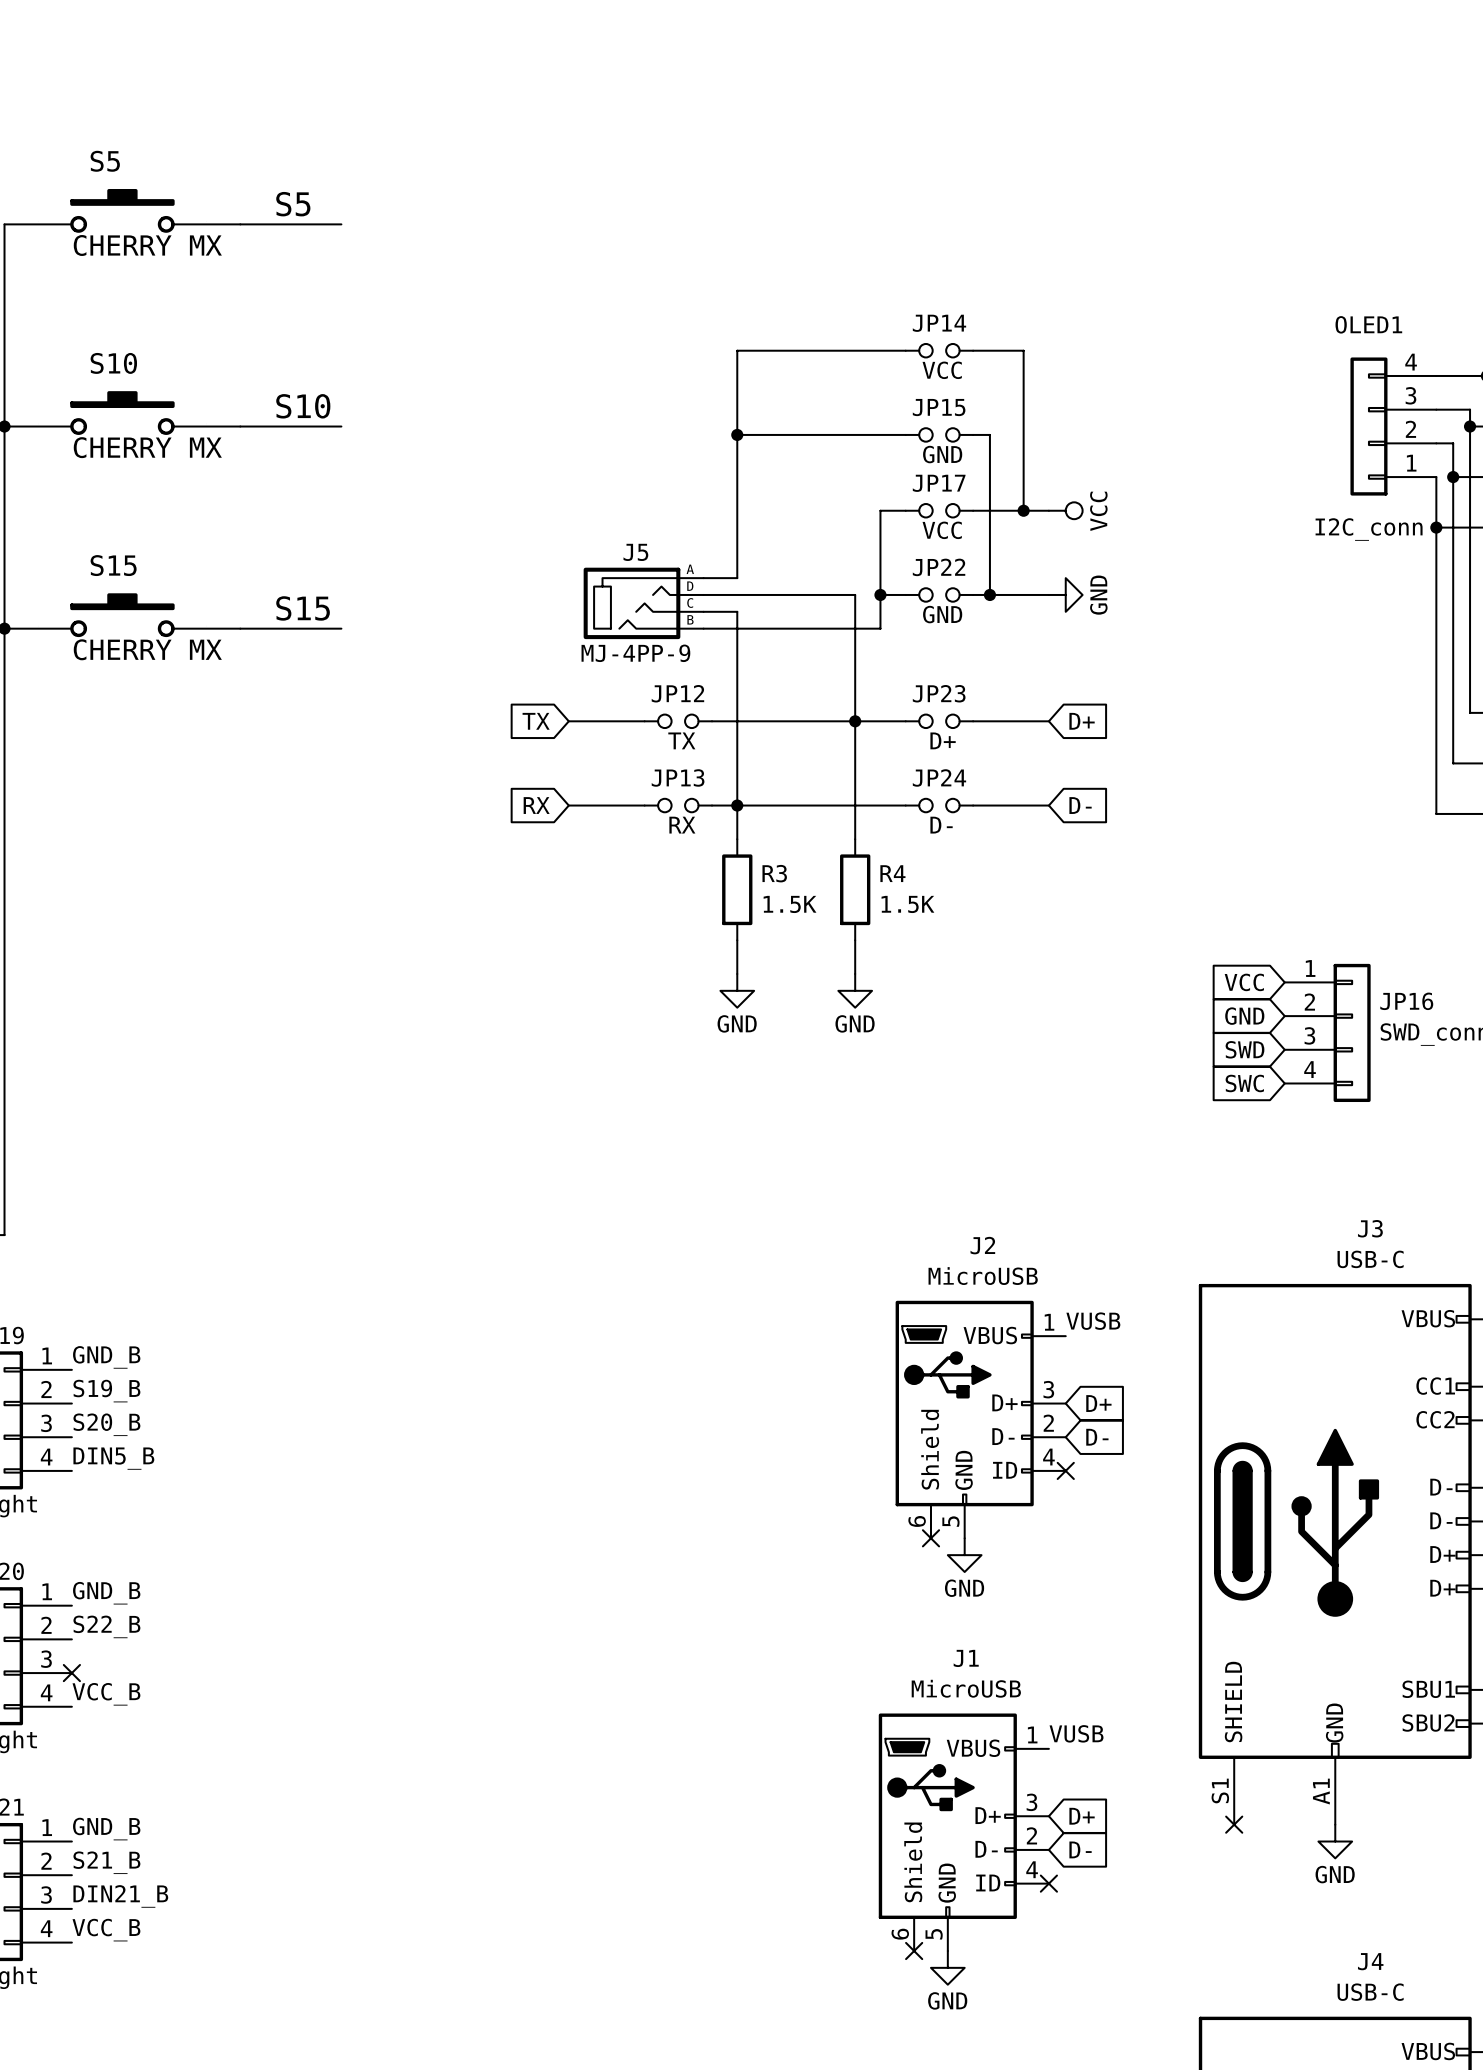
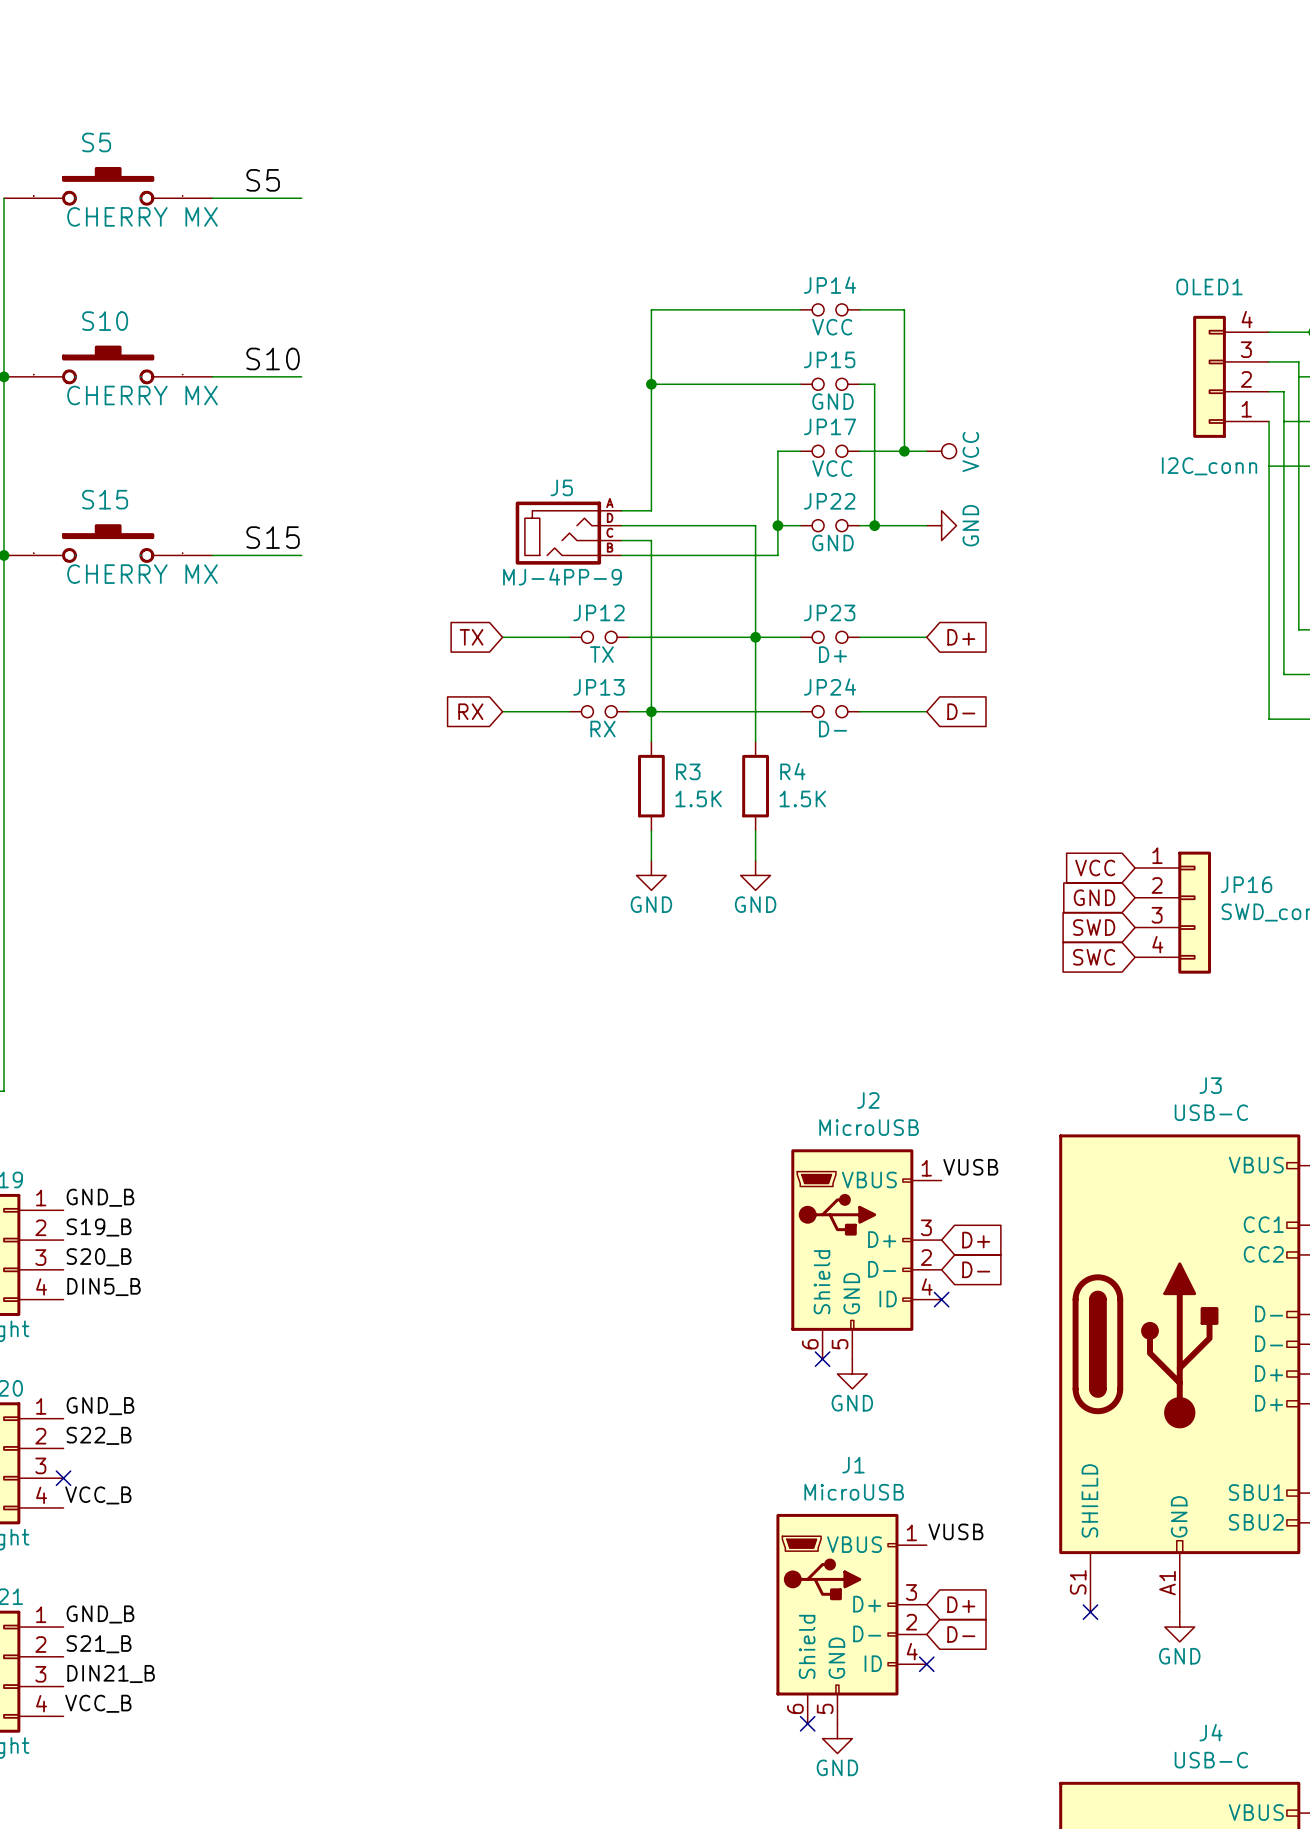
junction: (1470, 426) -> none
junction: (1453, 477) -> none
junction: (1436, 527) -> none

